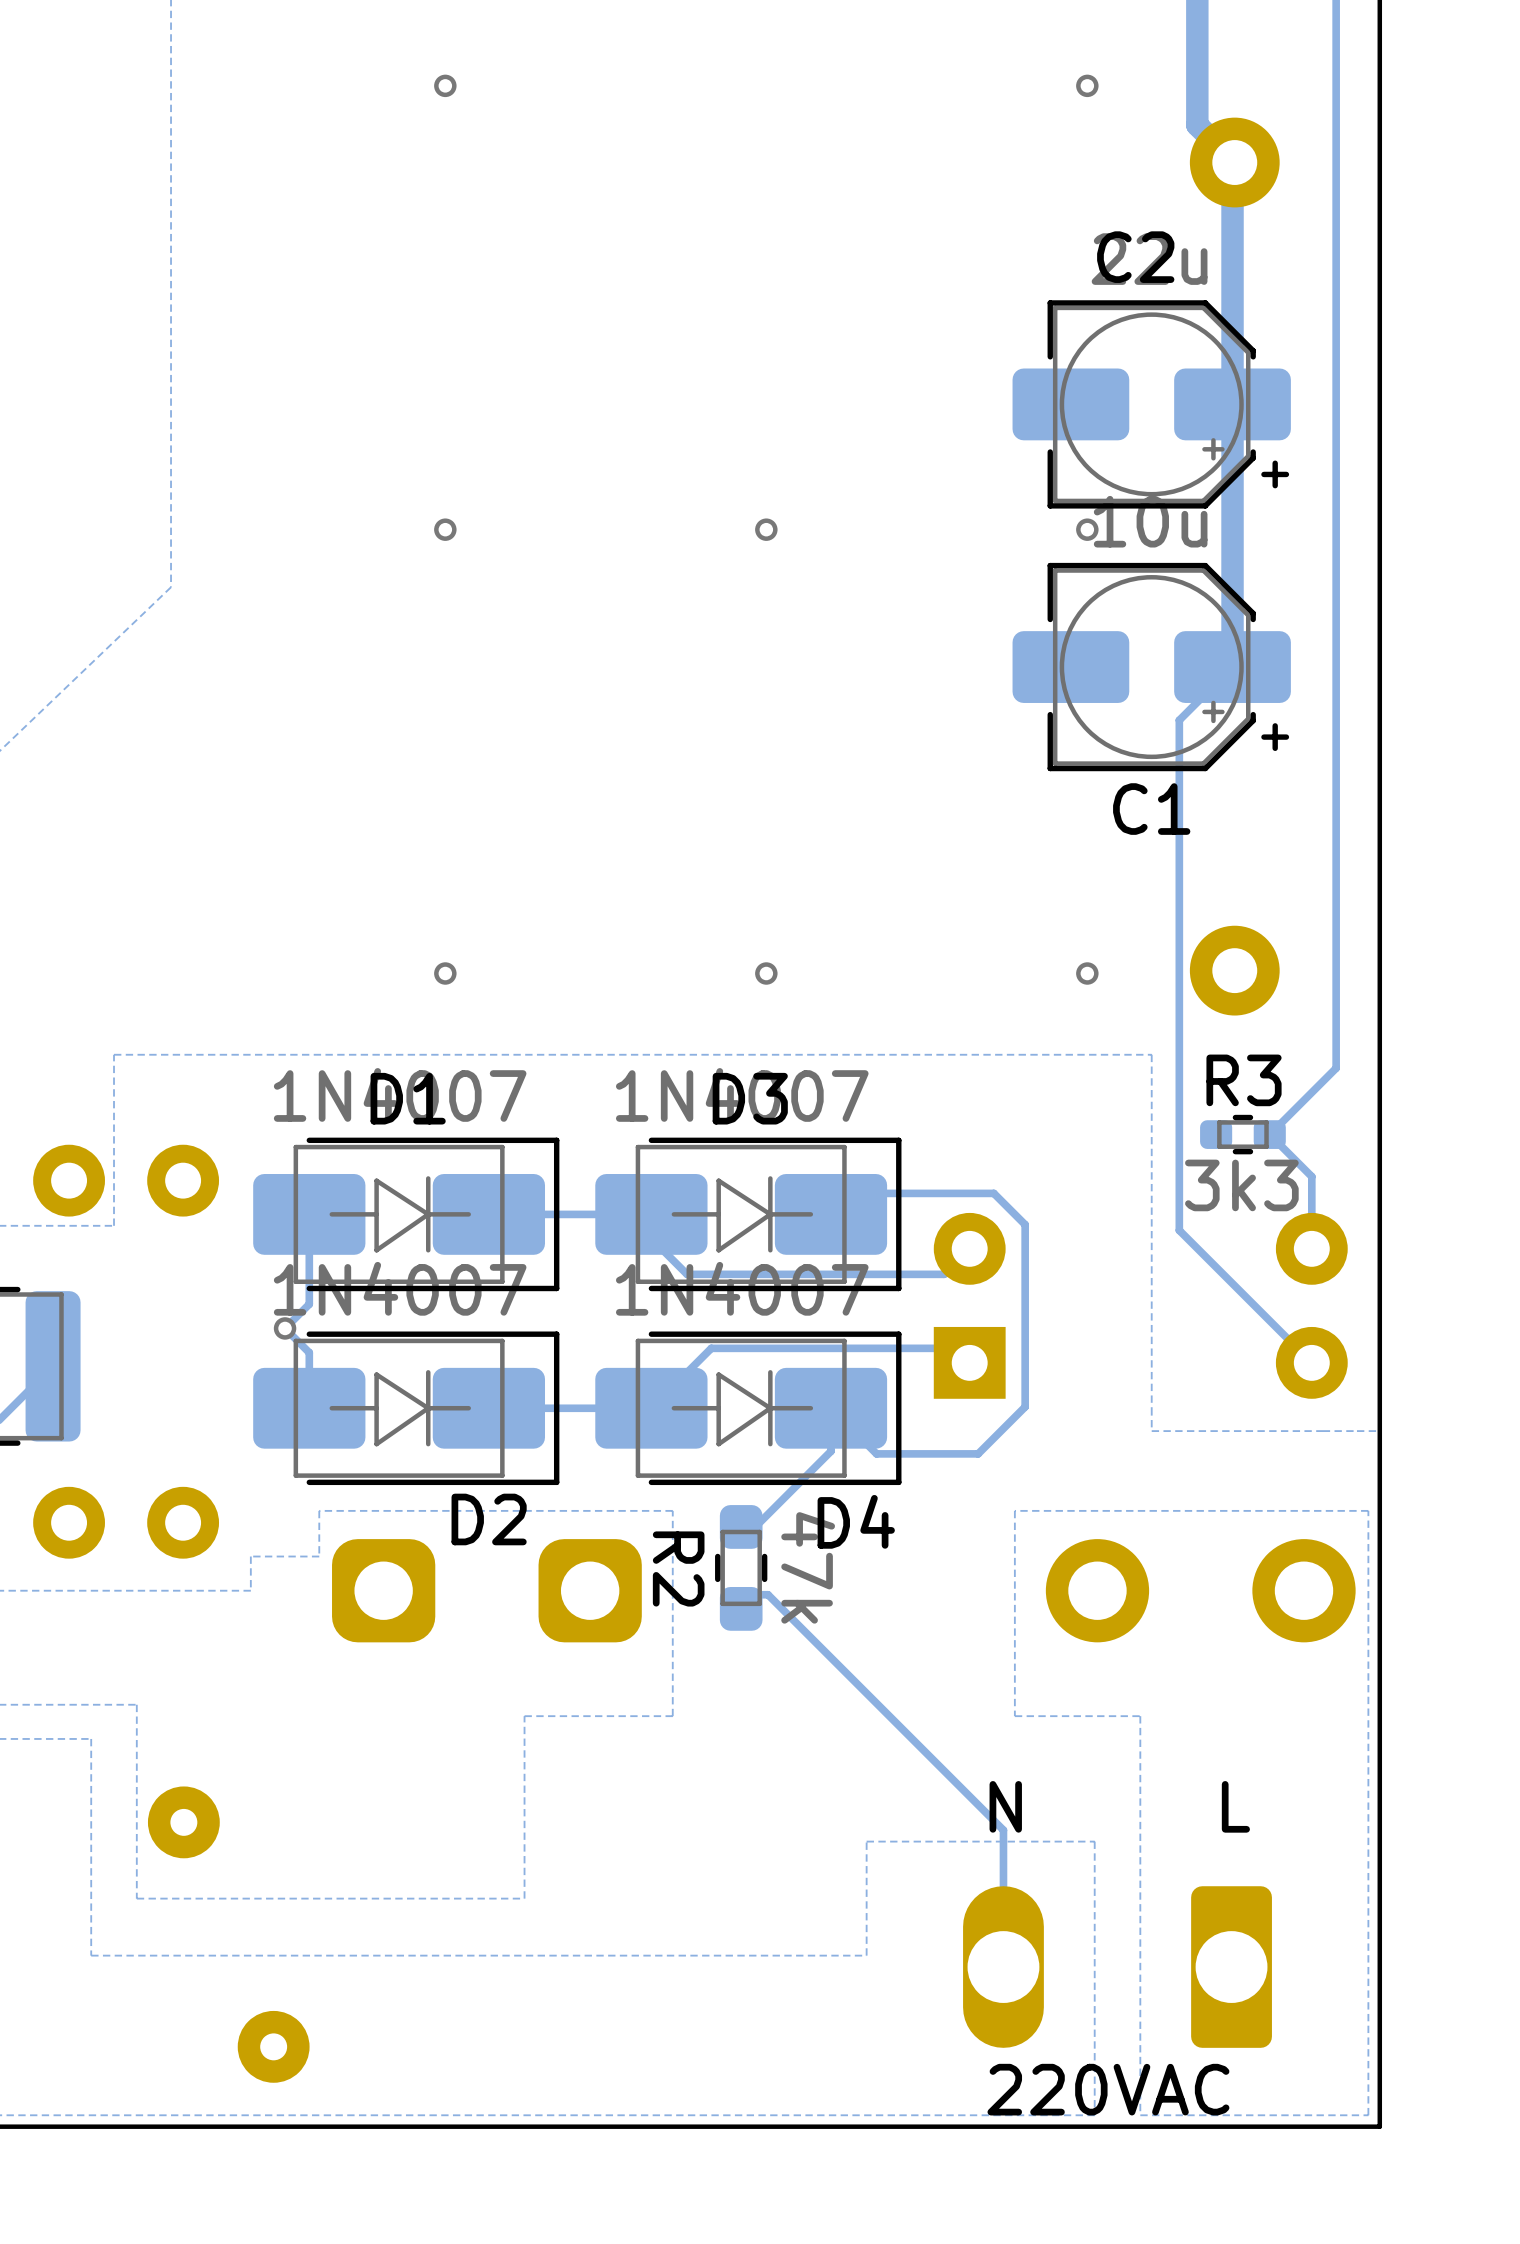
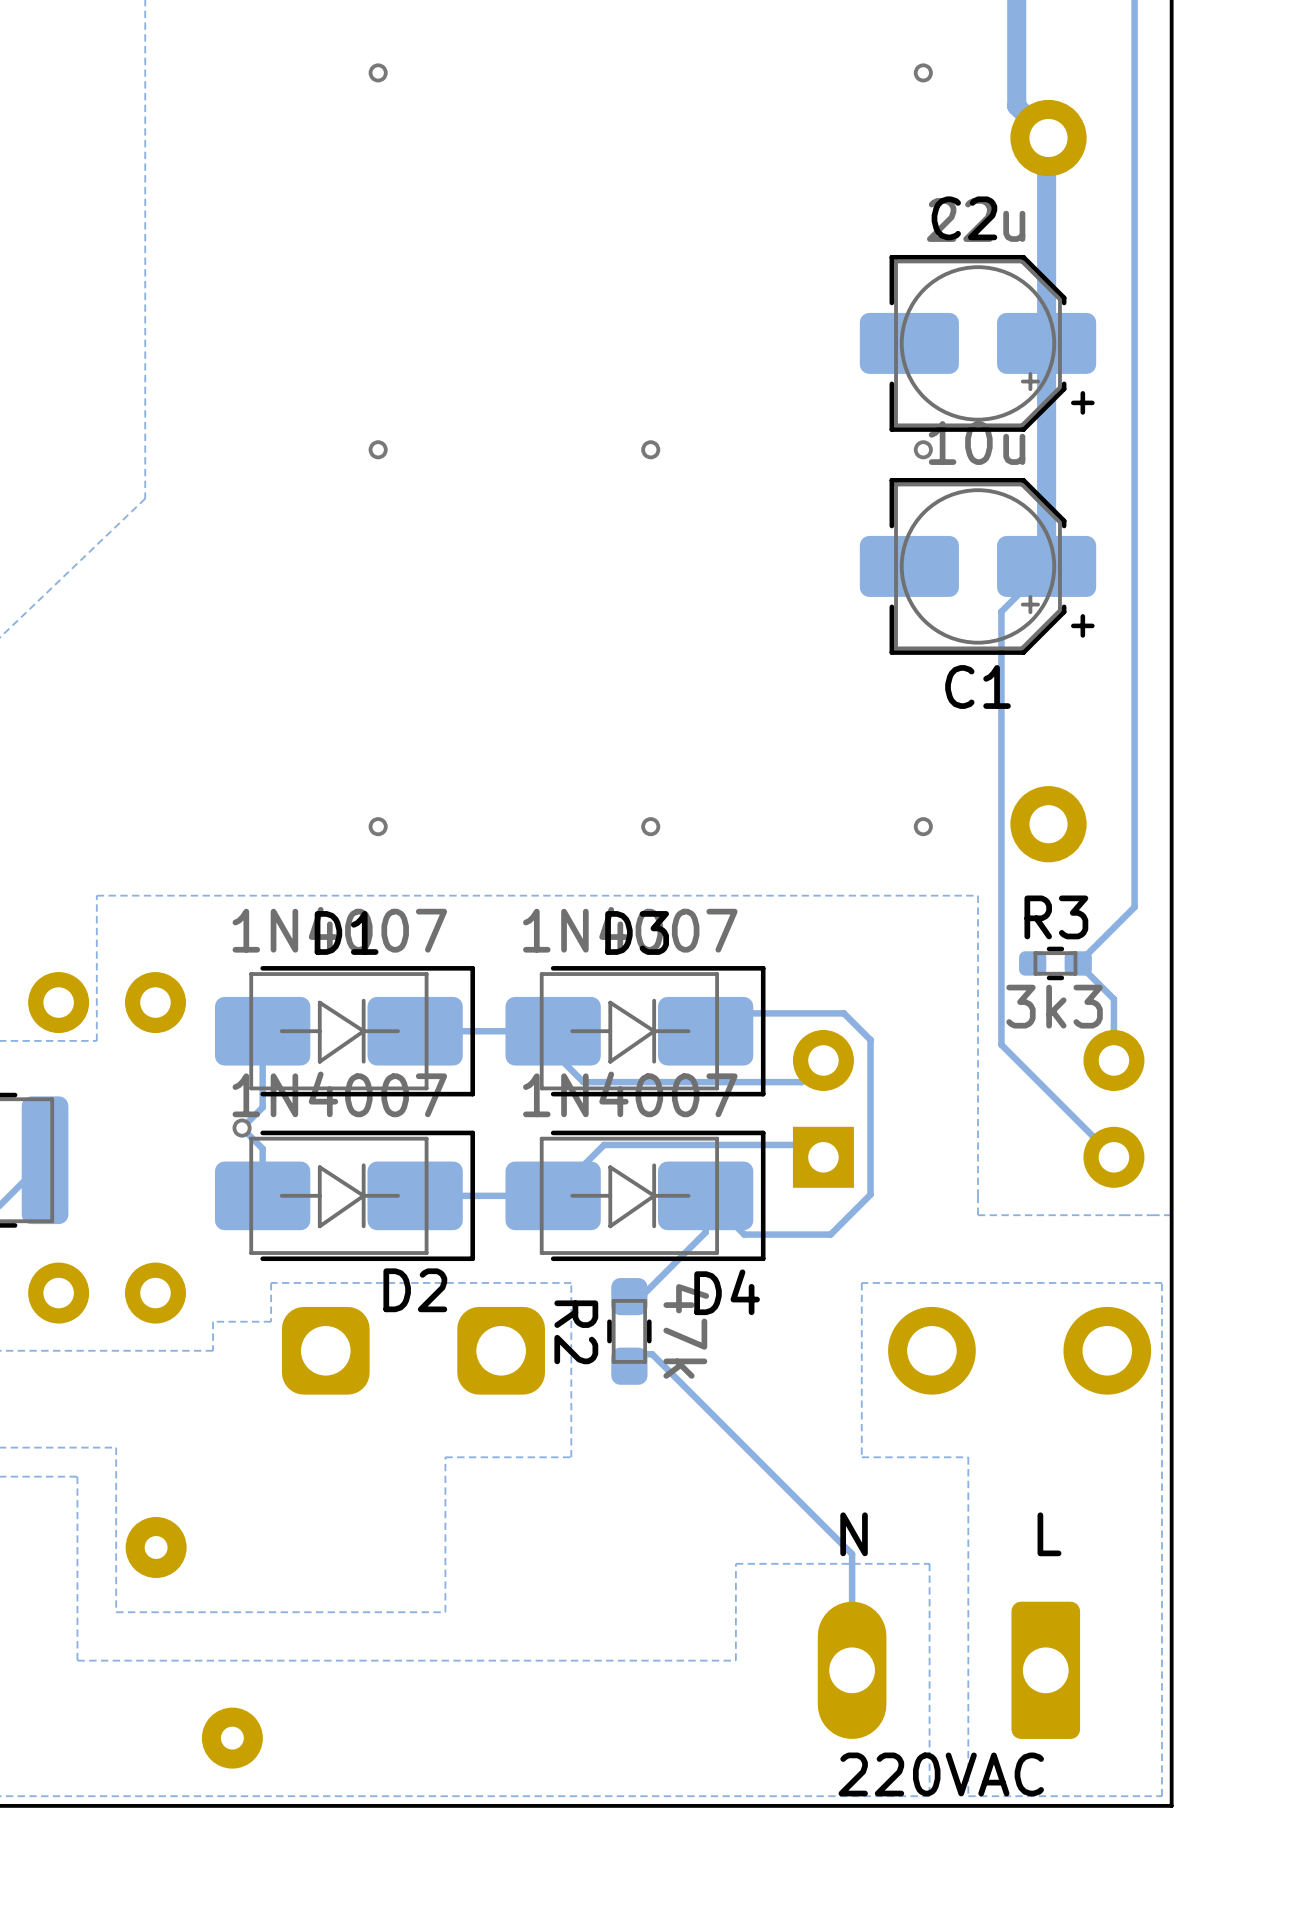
part footprint: [963, 1886, 1272, 2048] -> [817, 1601, 1081, 1739]

